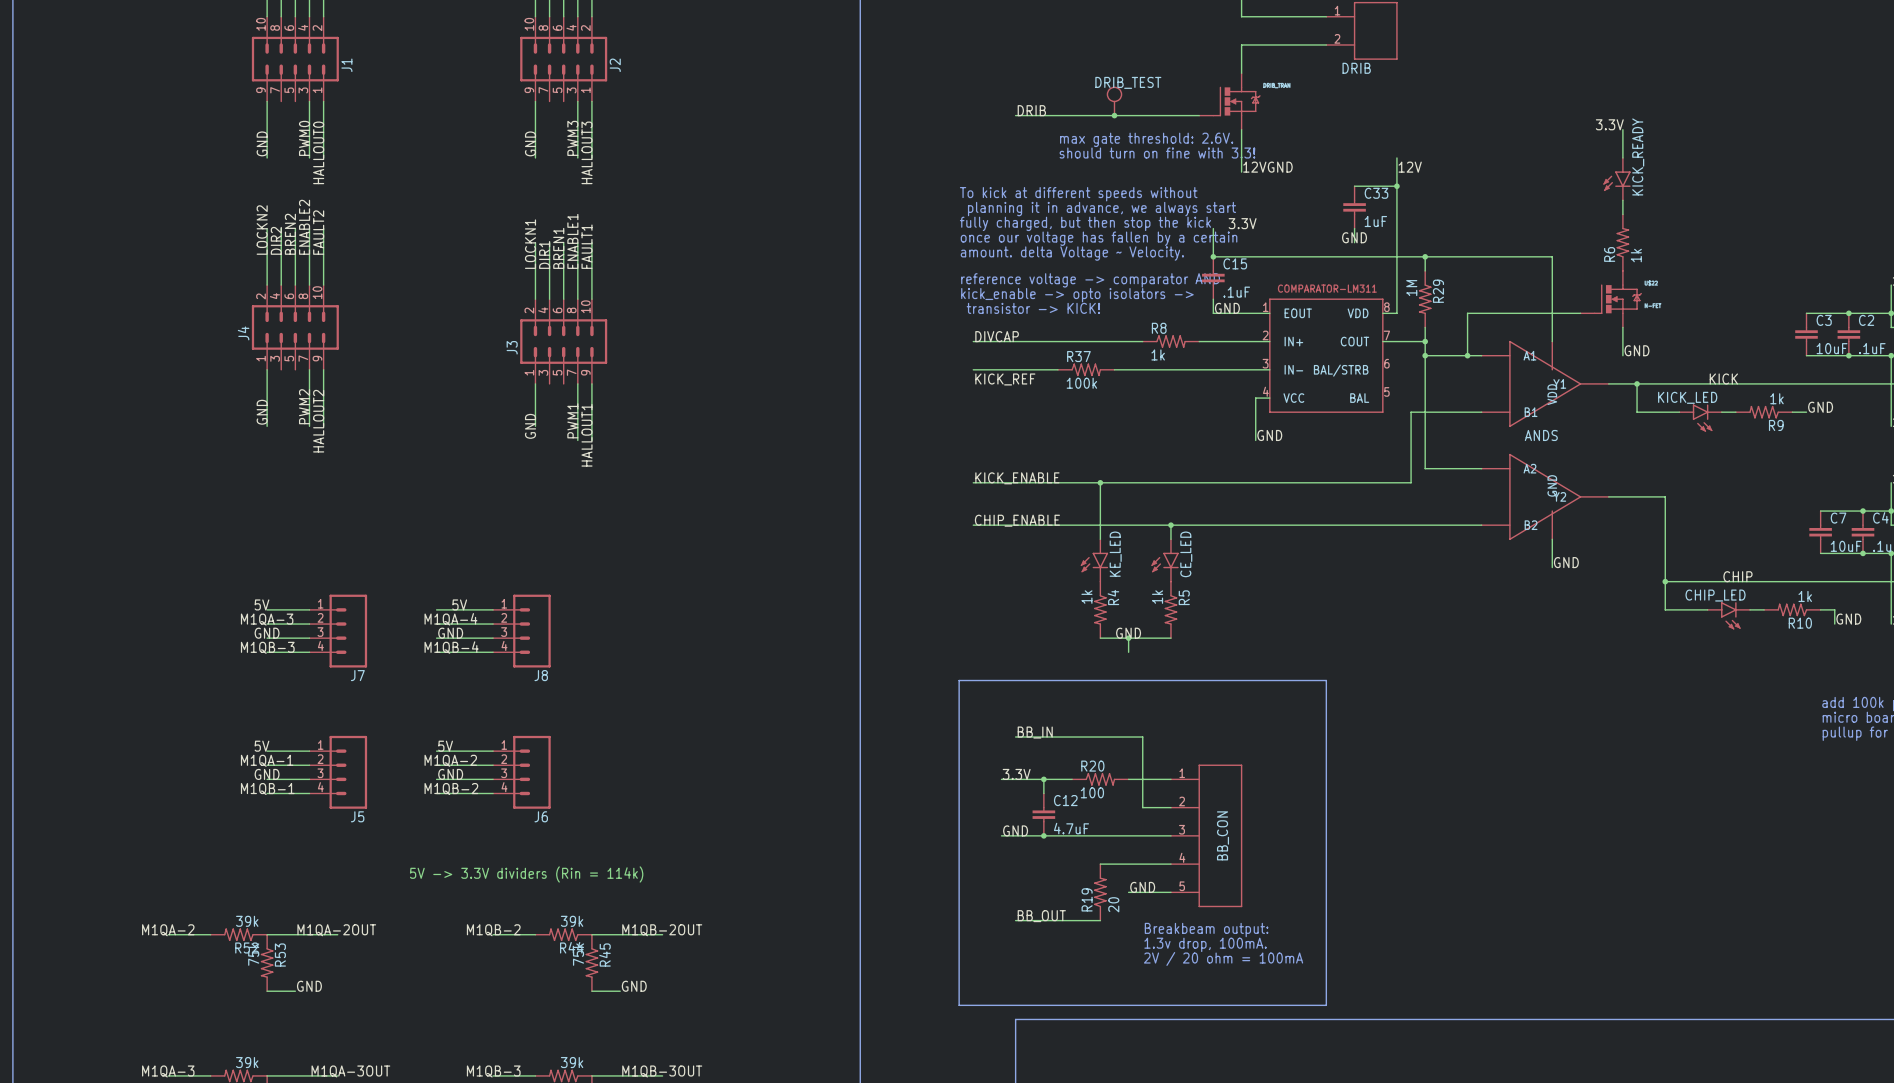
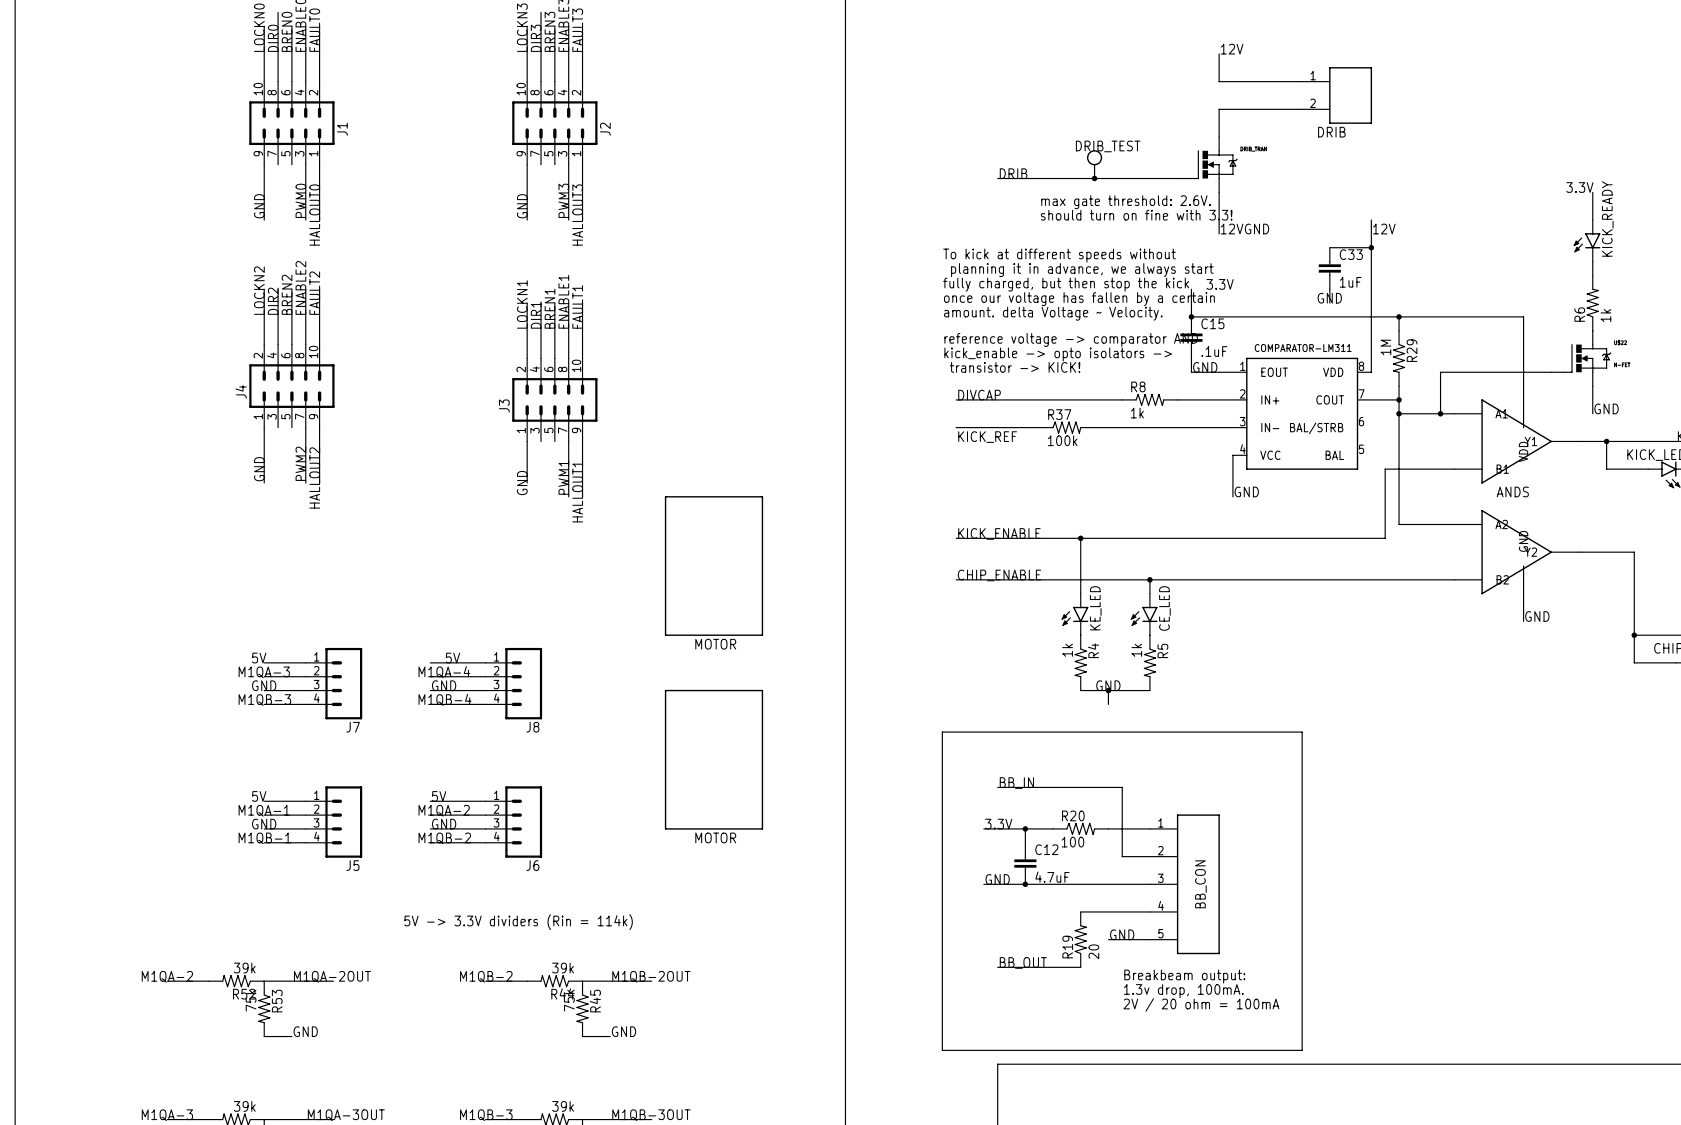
part: none -> (714, 566)
part: none -> (714, 759)

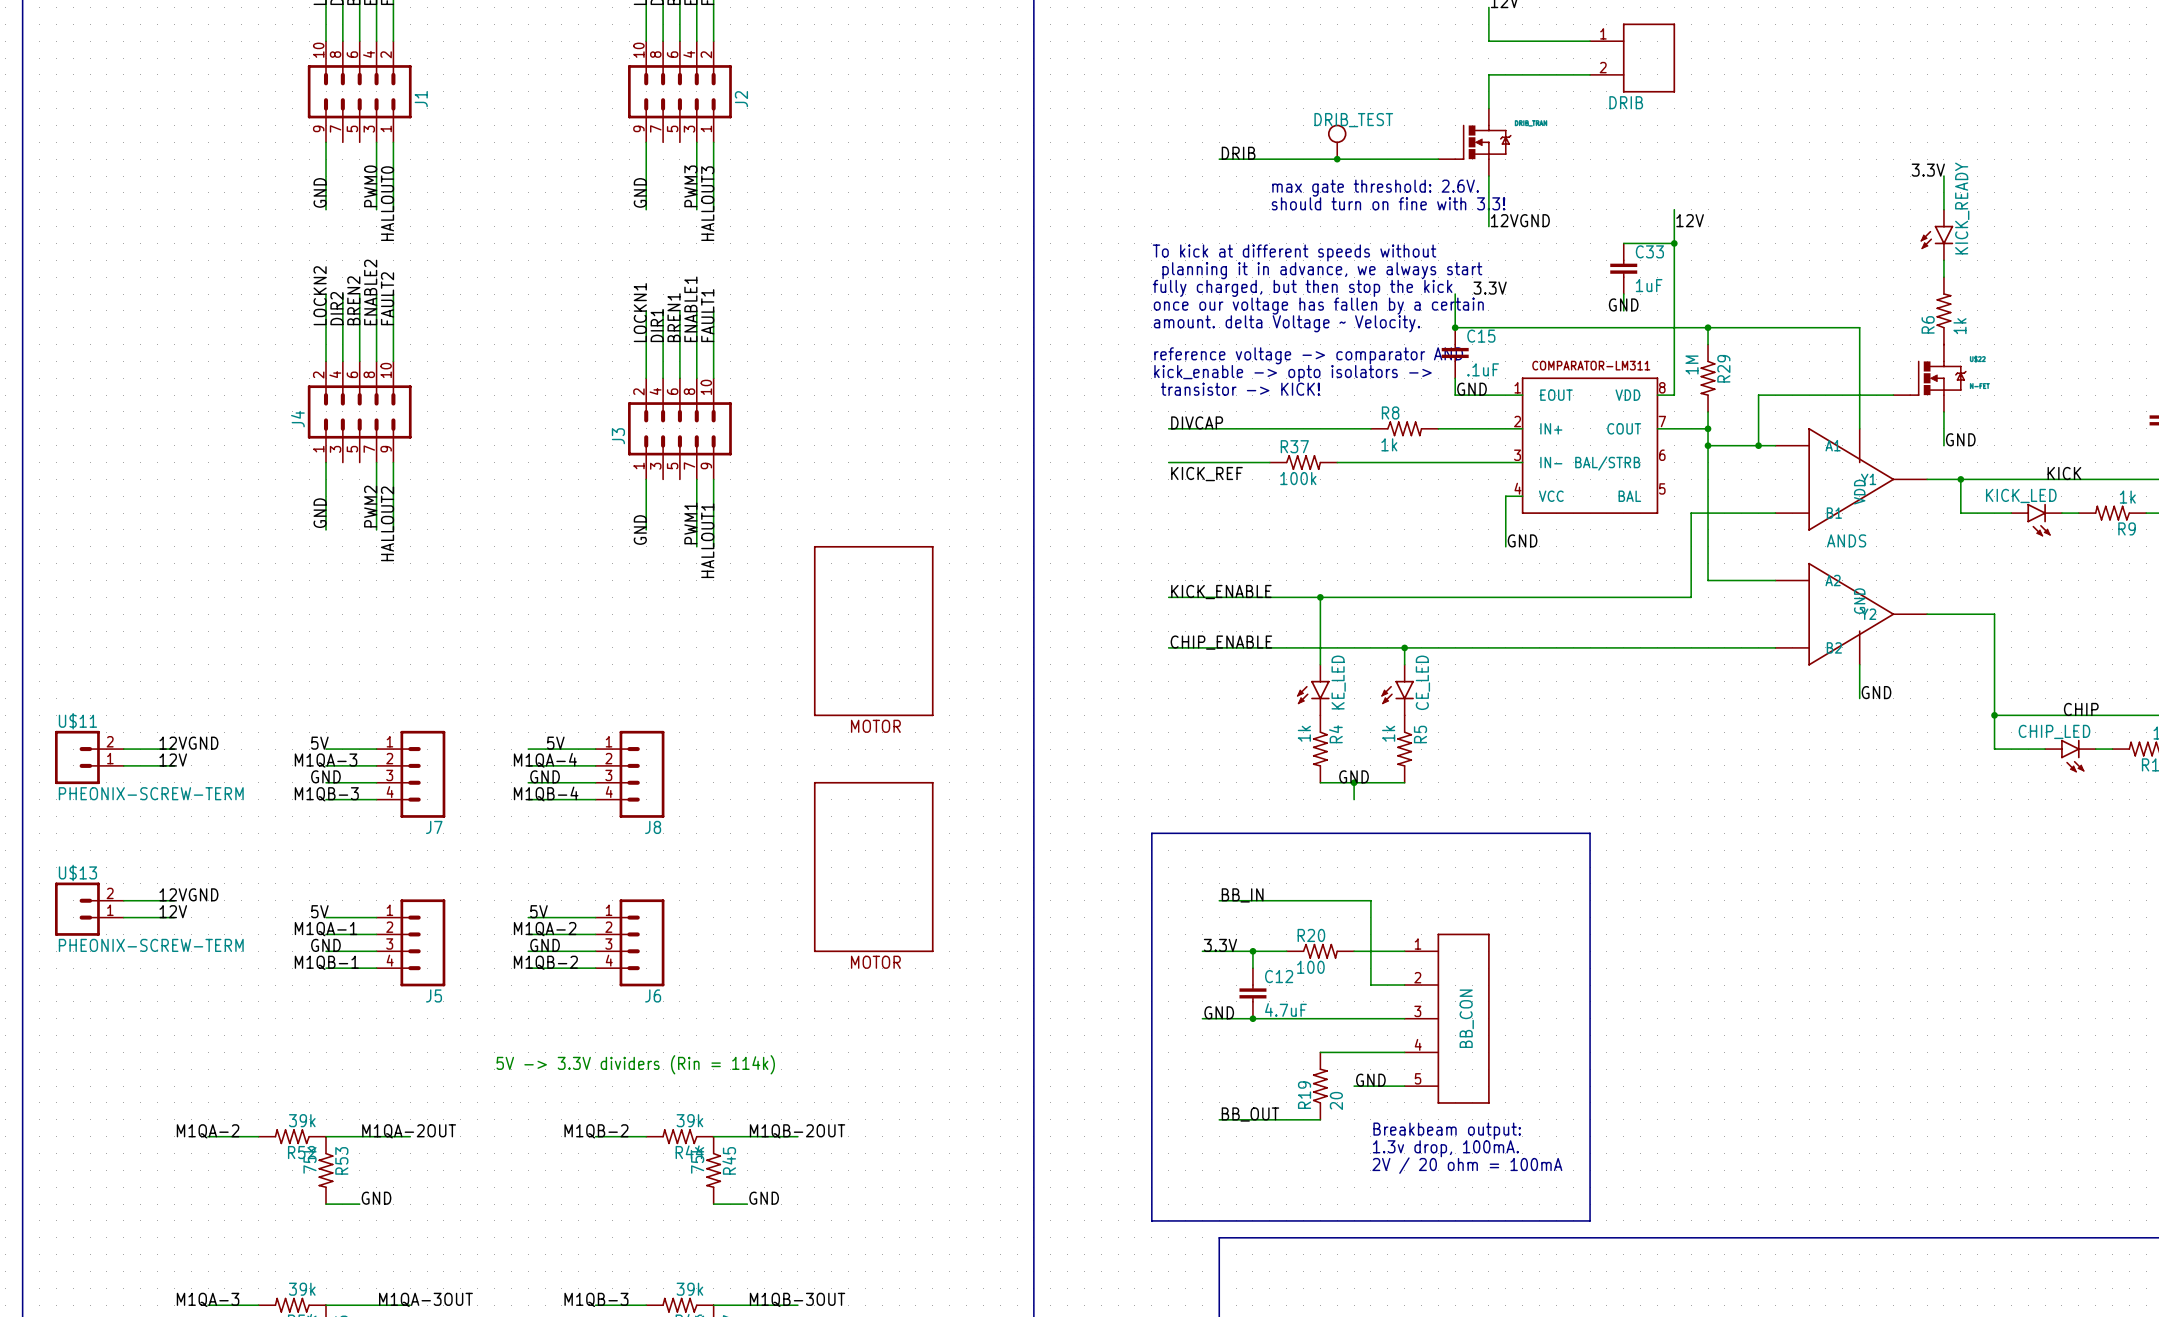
label: none -> 12VGND (188, 743)
wire: none -> (123, 749) (174, 749)
U$11: none -> PHEONIX-SCREW-TERM (89, 757)
label: none -> 12V (173, 760)
wire: none -> (123, 765) (174, 765)
label: none -> 12VGND (188, 894)
wire: none -> (123, 900) (174, 900)
U$13: none -> PHEONIX-SCREW-TERM (89, 909)
label: none -> 12V (173, 911)
wire: none -> (123, 917) (174, 917)

